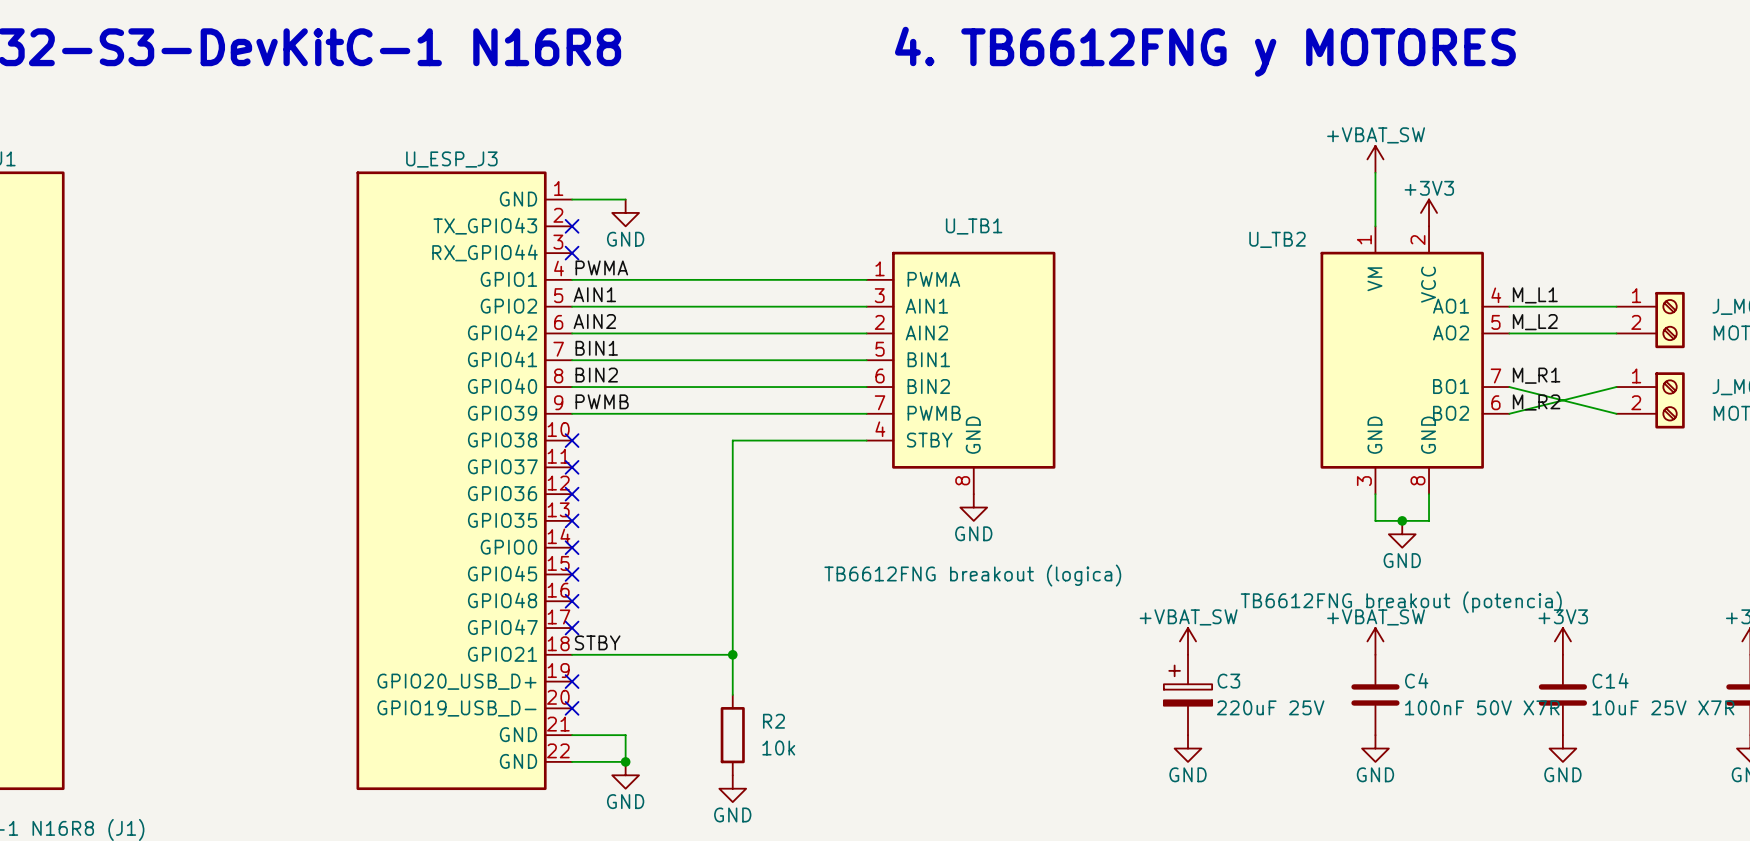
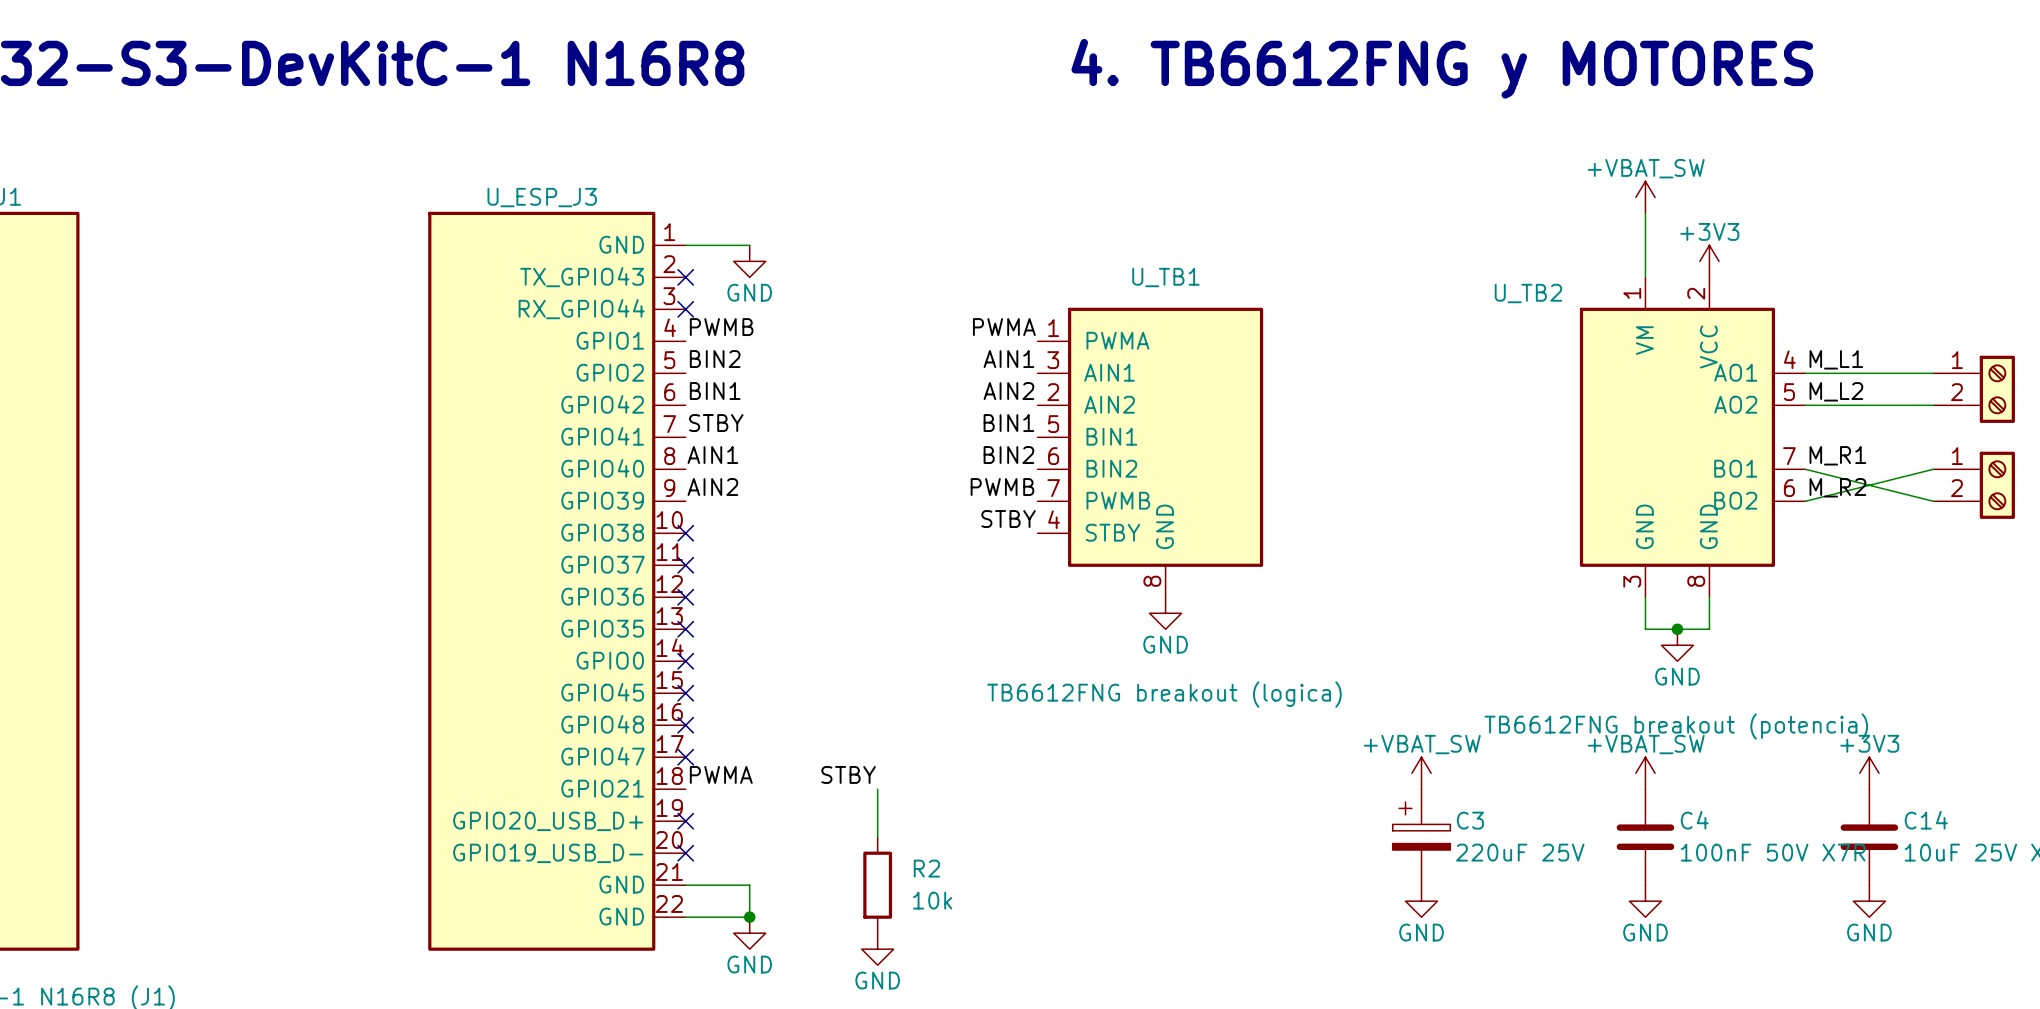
label: PWMA (601, 267) -> PWMB (721, 327)
label: none -> PWMA (1004, 327)
wire: (572, 279) (866, 279) -> none
label: AIN1 (594, 294) -> BIN2 (715, 359)
label: none -> AIN1 (1008, 359)
wire: (572, 306) (866, 306) -> none
label: AIN2 (594, 321) -> BIN1 (715, 391)
label: none -> AIN2 (1008, 391)
wire: (572, 333) (866, 333) -> none
label: BIN1 (596, 348) -> STBY (716, 423)
label: none -> BIN1 (1008, 423)
wire: (572, 360) (866, 360) -> none
label: BIN2 (596, 375) -> AIN1 (712, 455)
label: none -> BIN2 (1008, 455)
wire: (572, 387) (866, 387) -> none
label: PWMB (602, 401) -> AIN2 (712, 487)
label: none -> PWMB (1002, 487)
wire: (572, 413) (866, 413) -> none
label: none -> STBY (1008, 519)
wire: (866, 440) (732, 440) (732, 654) (572, 654) -> none
label: STBY (597, 642) -> PWMA (721, 774)
label: none -> STBY (848, 774)
junction: (732, 654) -> none

